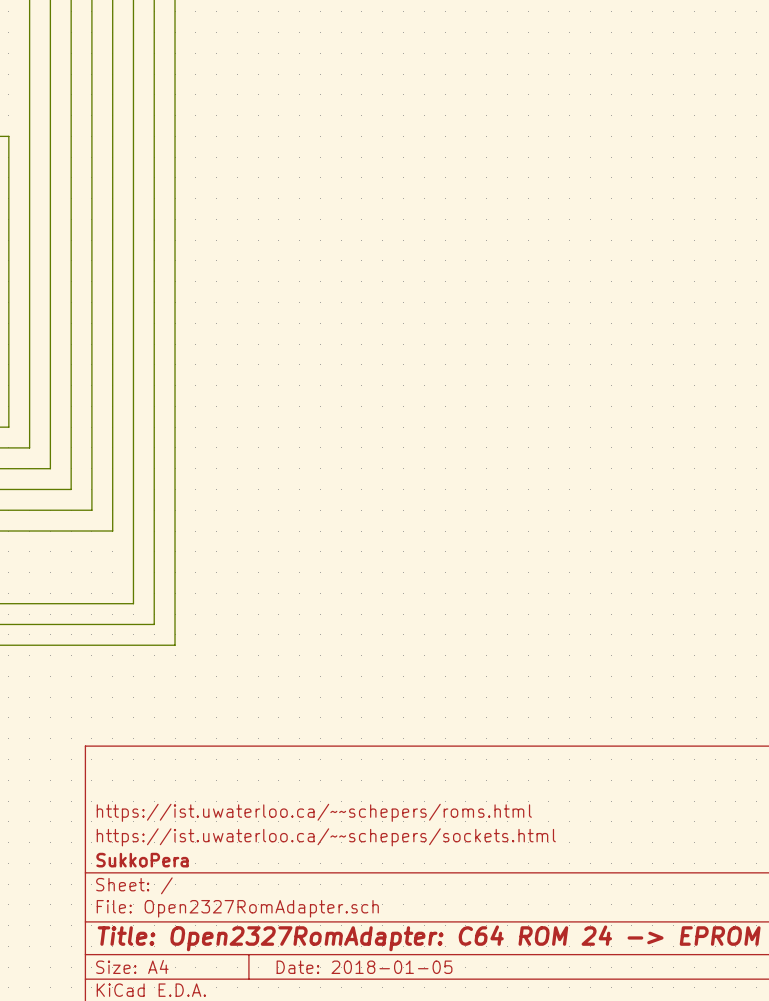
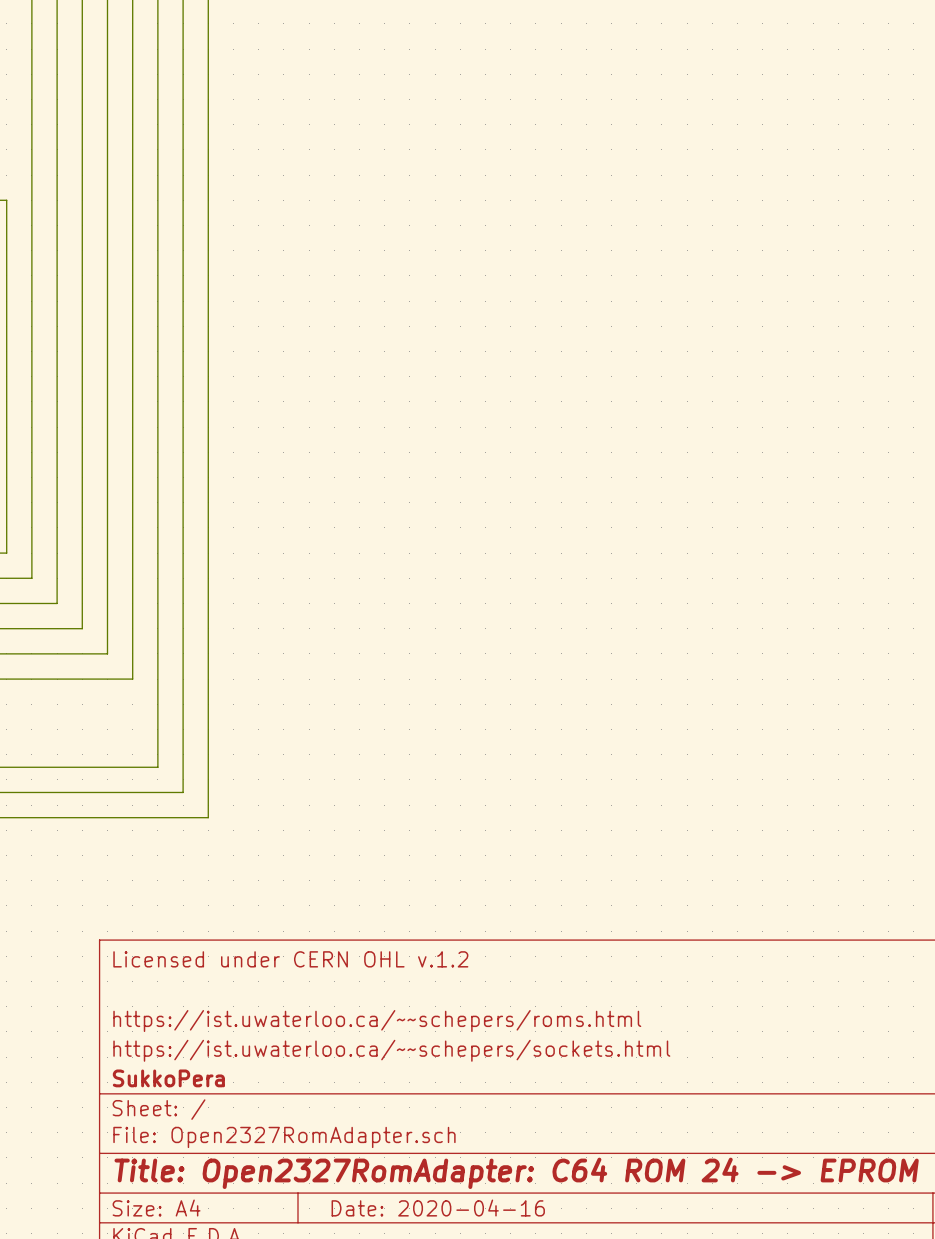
title block: none -> Licensed under CERN OHL v.1.2 (290, 959)
title block: Date: 2018-01-05 (364, 967) -> Date: 2020-04-16 (438, 1208)

